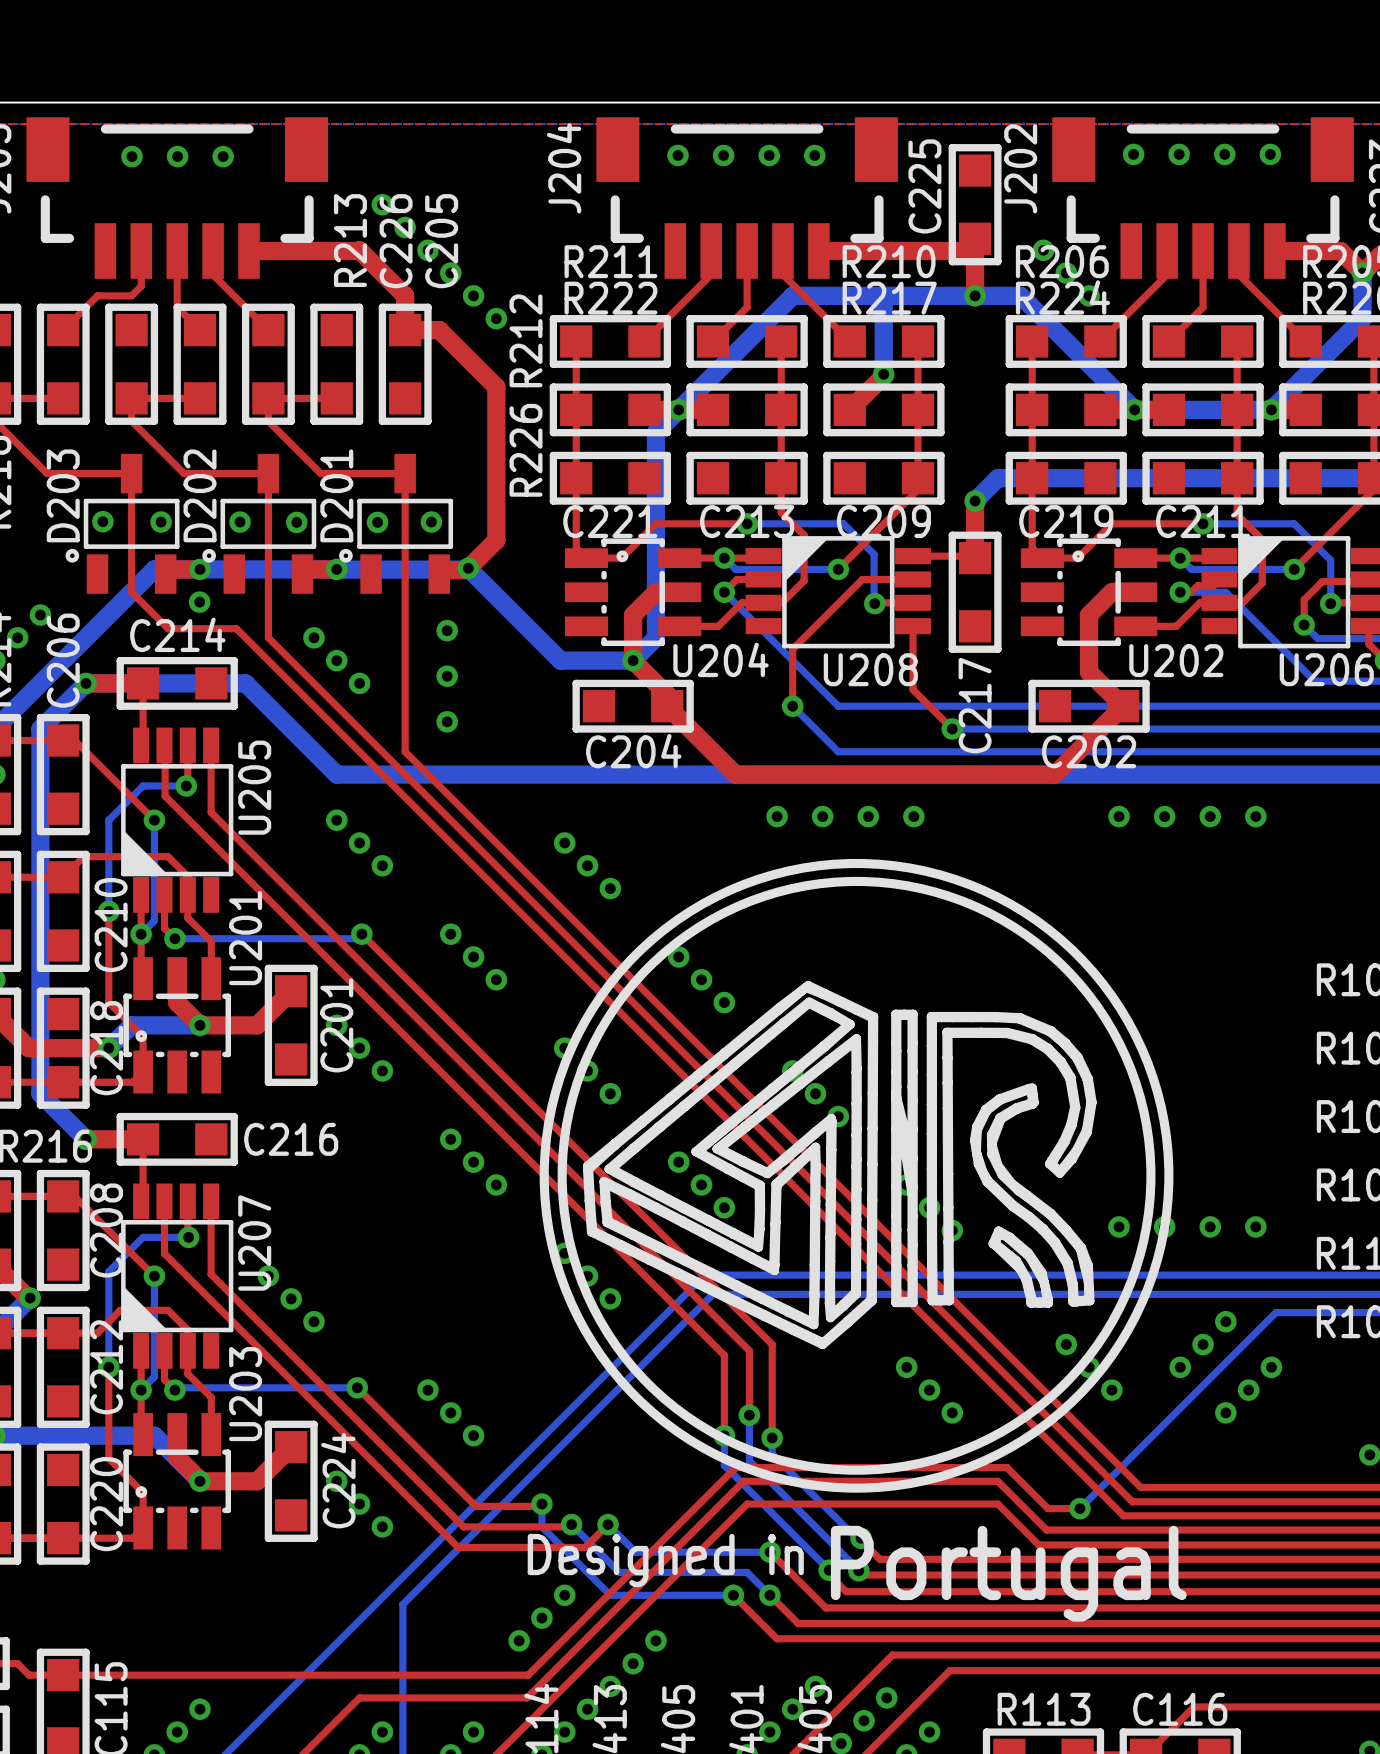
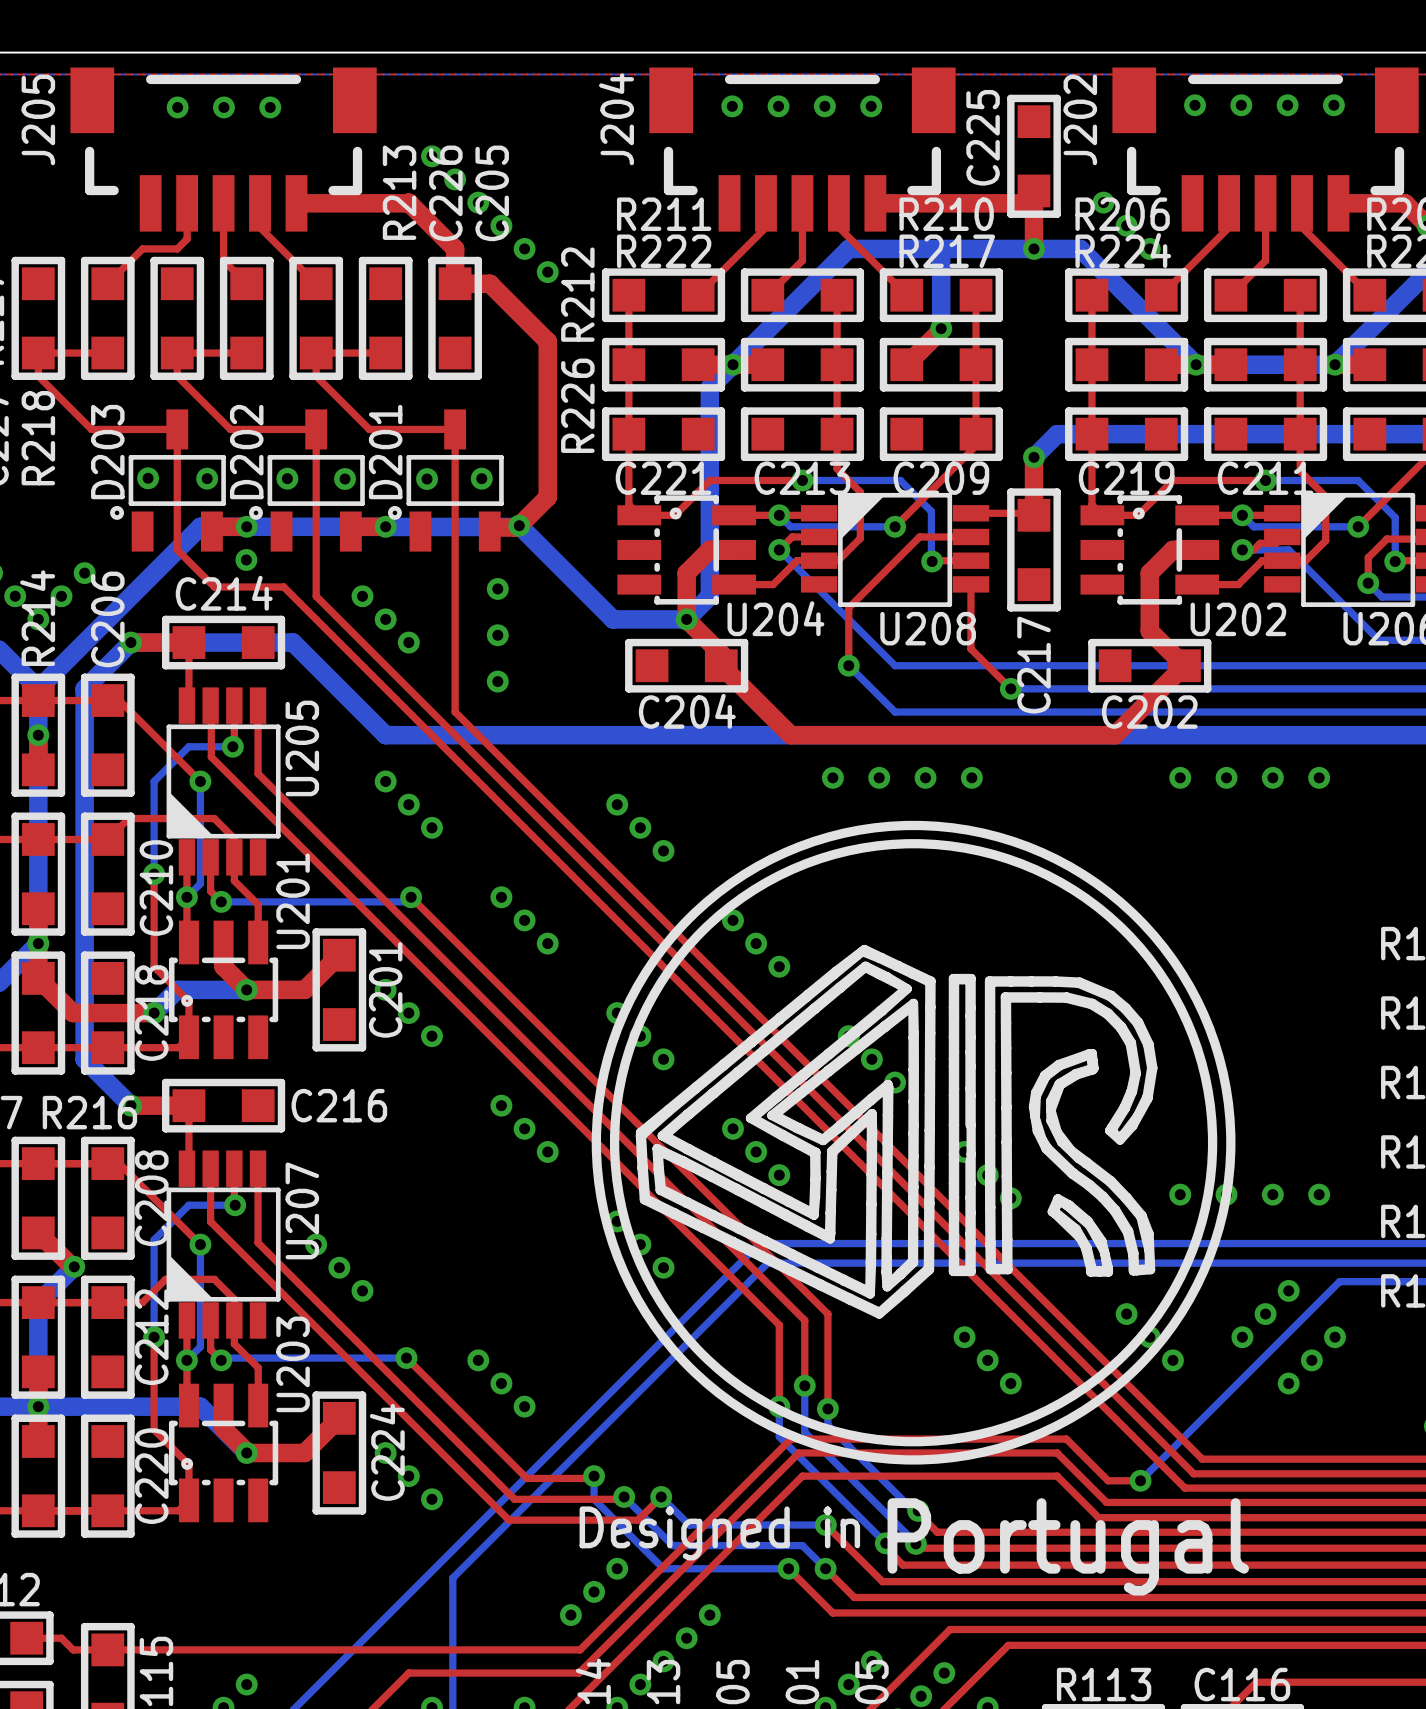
drawing shape: [539, 858, 1174, 1493] -> [591, 820, 1236, 1465]

